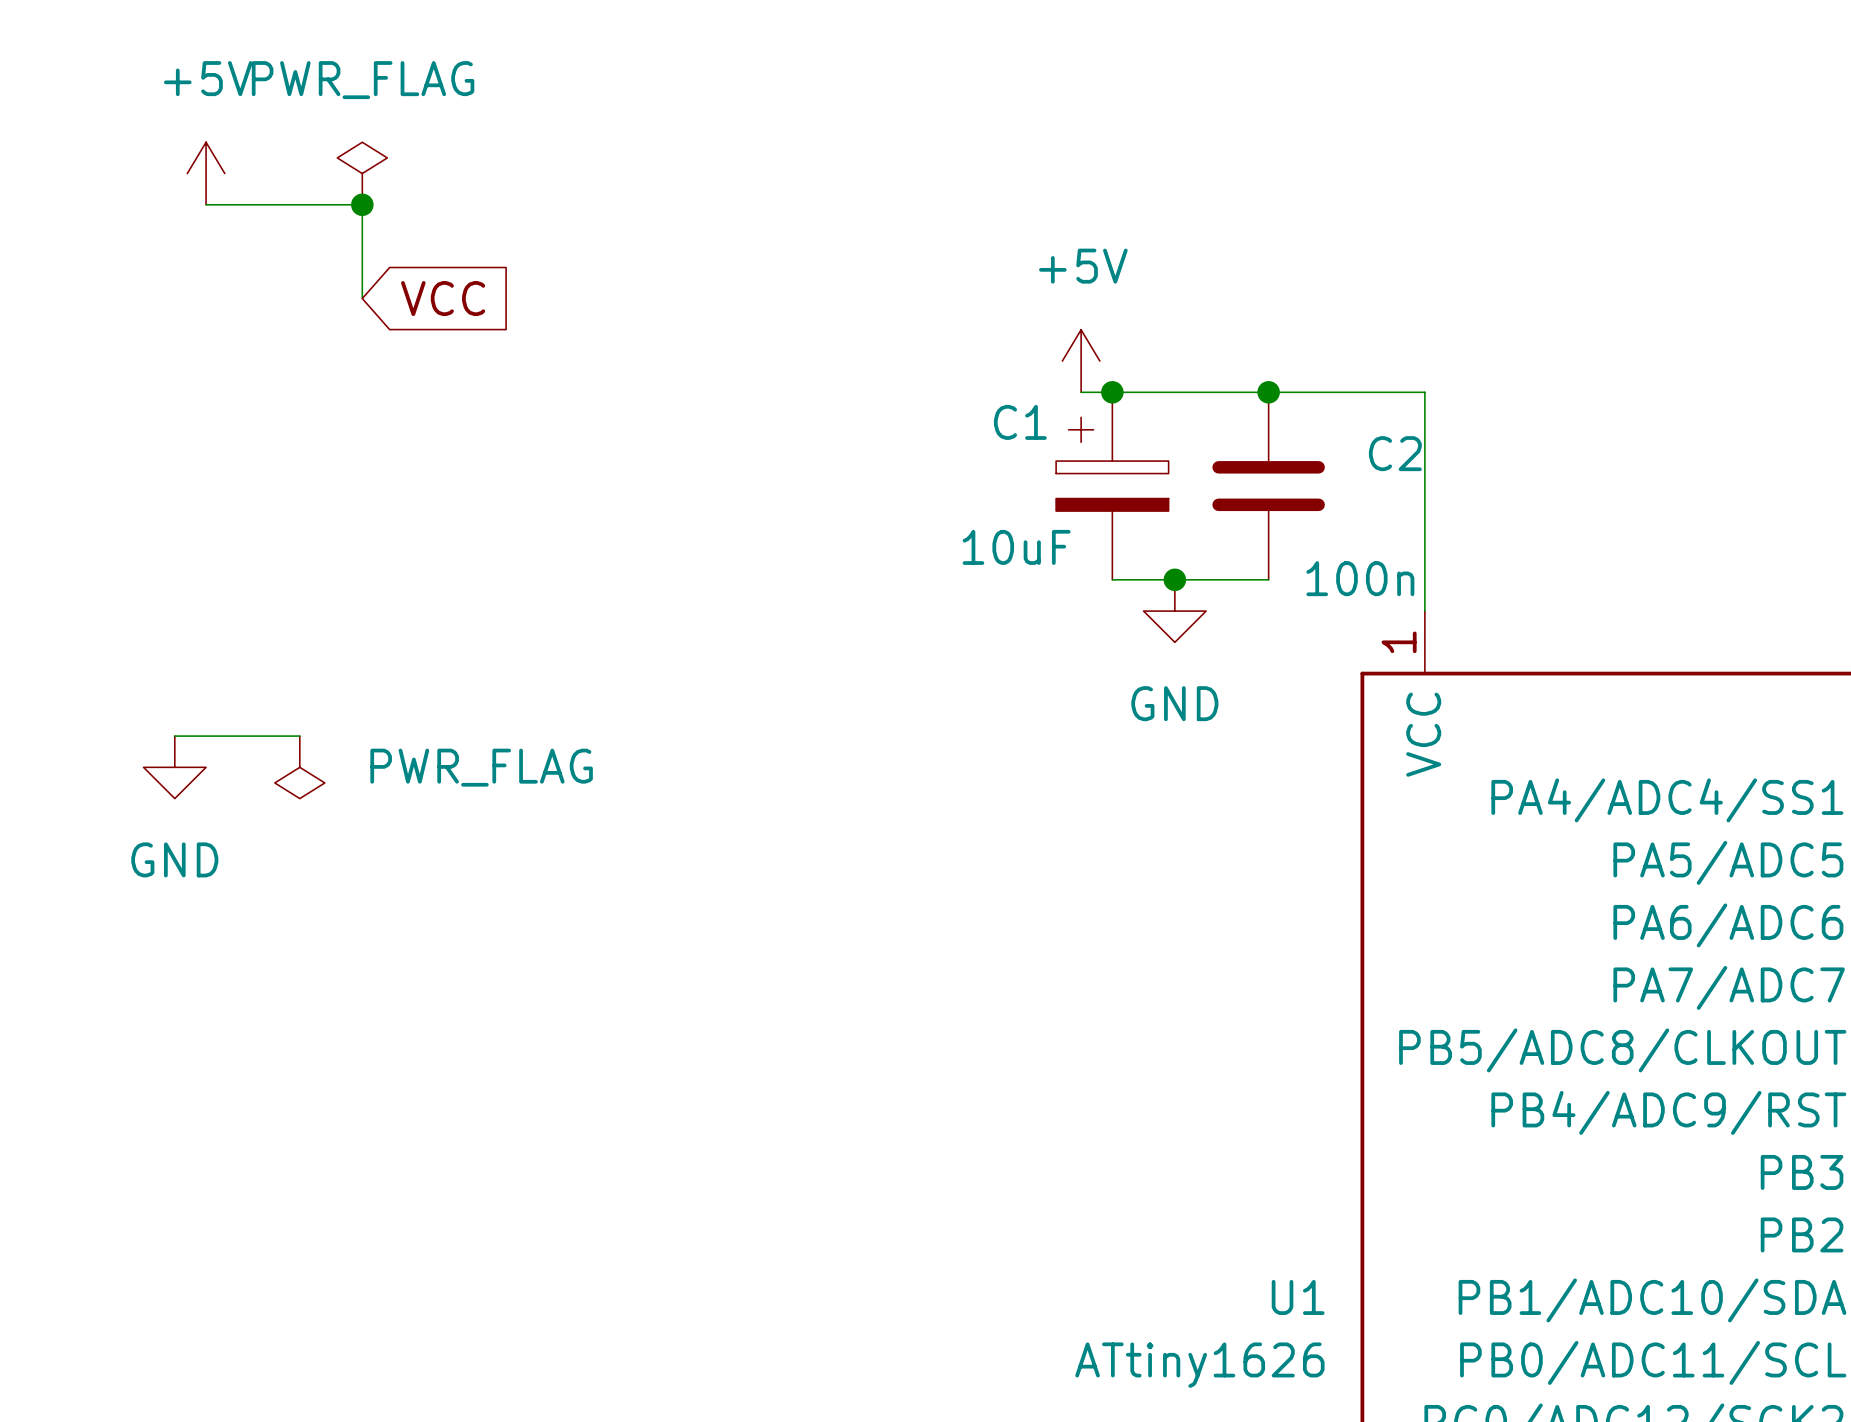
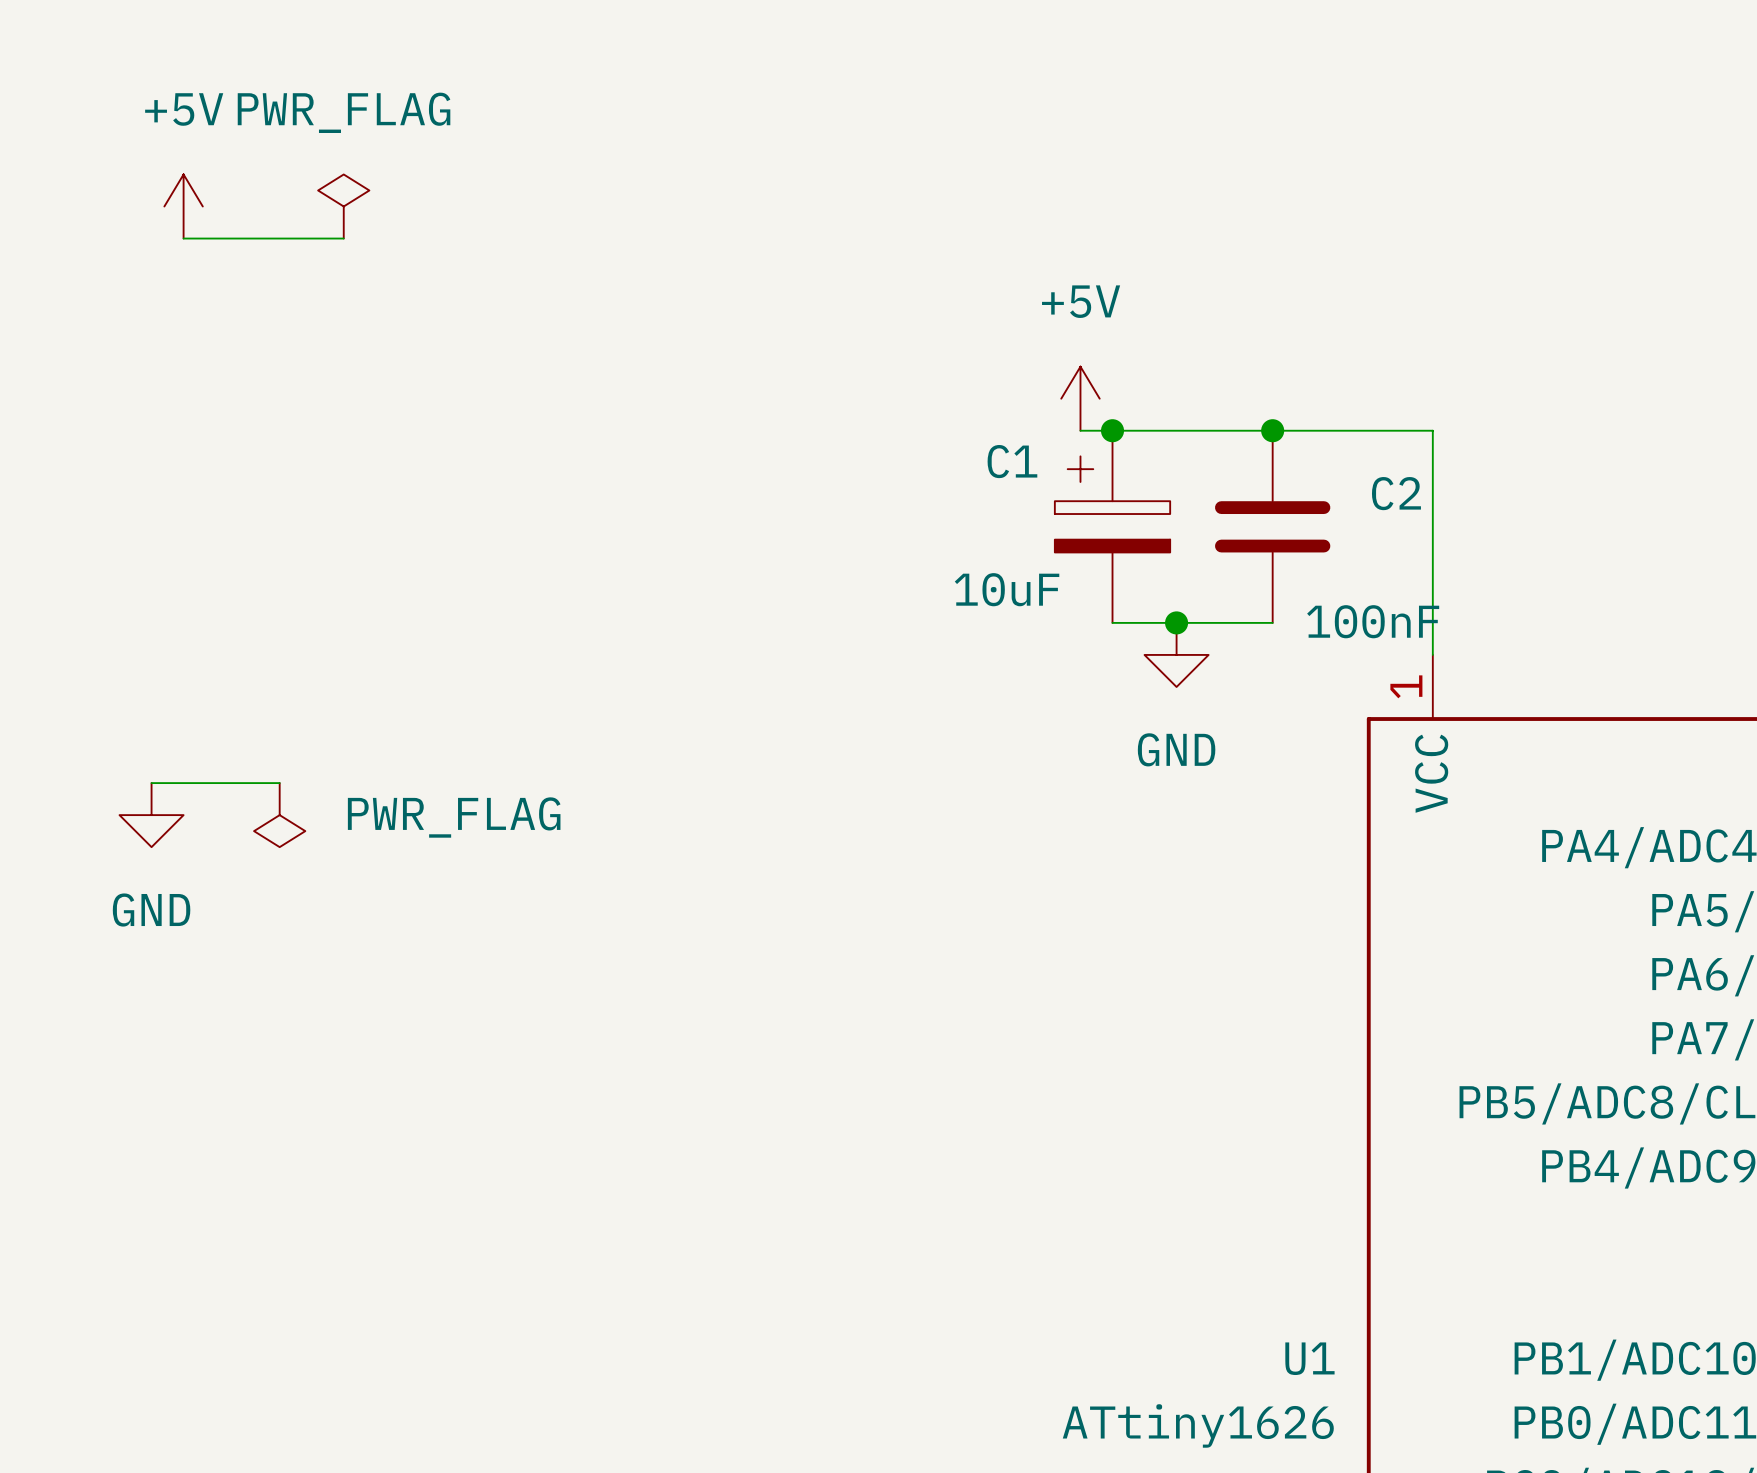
wire: (362, 204) (362, 298) -> none
junction: (362, 204) -> none
global label: VCC (443, 298) -> none
C2 value: 100n (1360, 578) -> 100nF (1373, 621)

